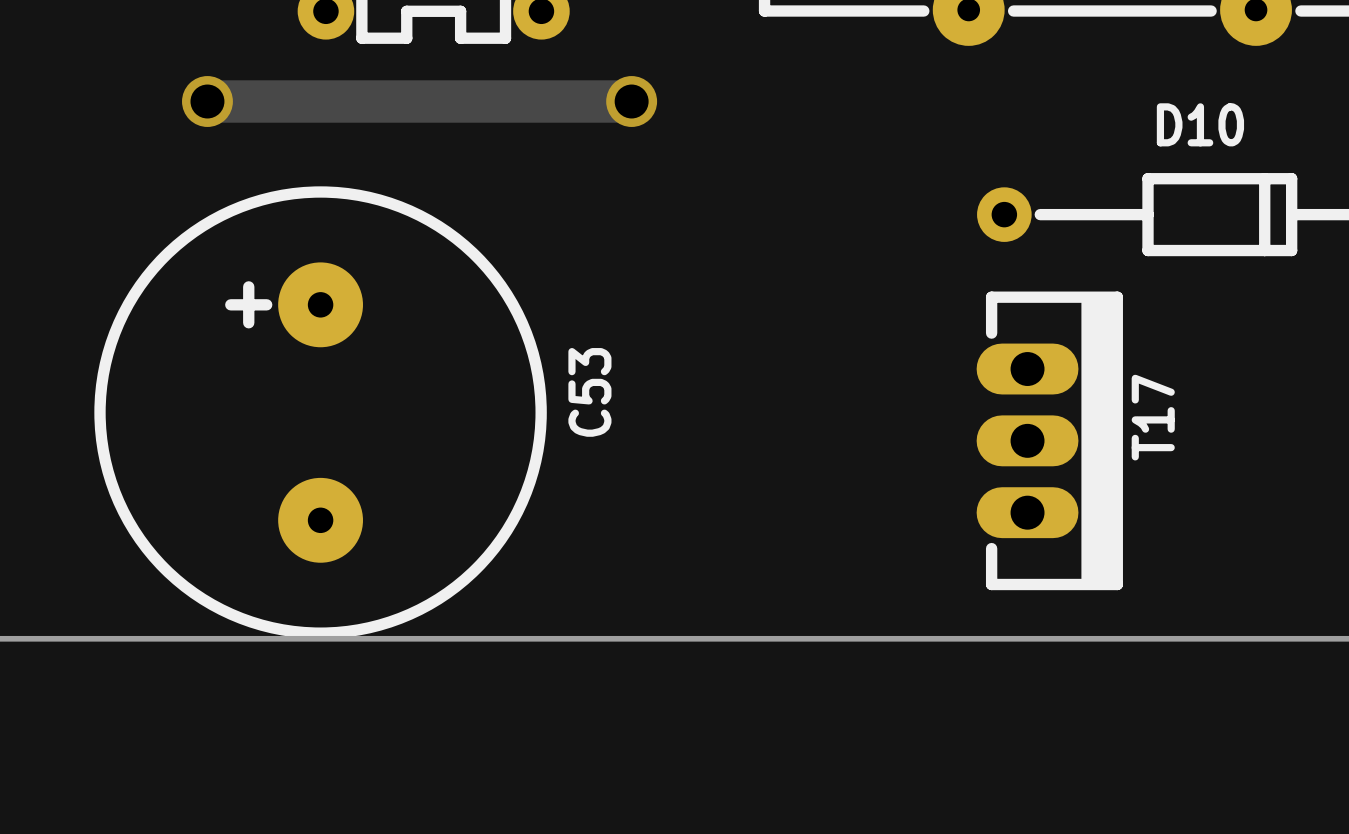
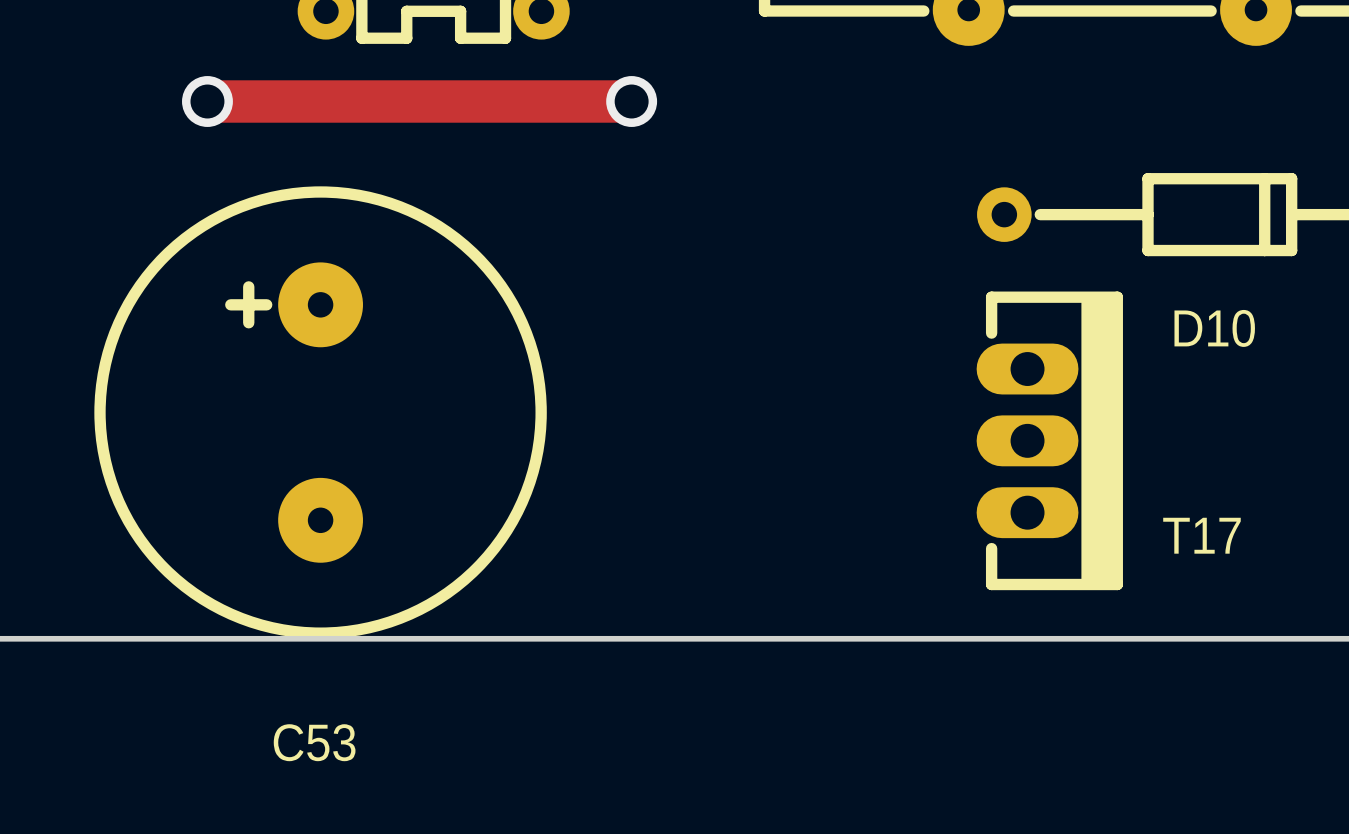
D10 name position: D10 (1200, 124) -> D10 (1214, 328)
C53 name rotation: 0° (589, 392) -> 90° clockwise (314, 742)
C53 name position: C53 (589, 392) -> C53 (314, 742)
T17 name rotation: 0° (1153, 417) -> 90° clockwise (1201, 535)
T17 name position: T17 (1153, 417) -> T17 (1201, 535)

